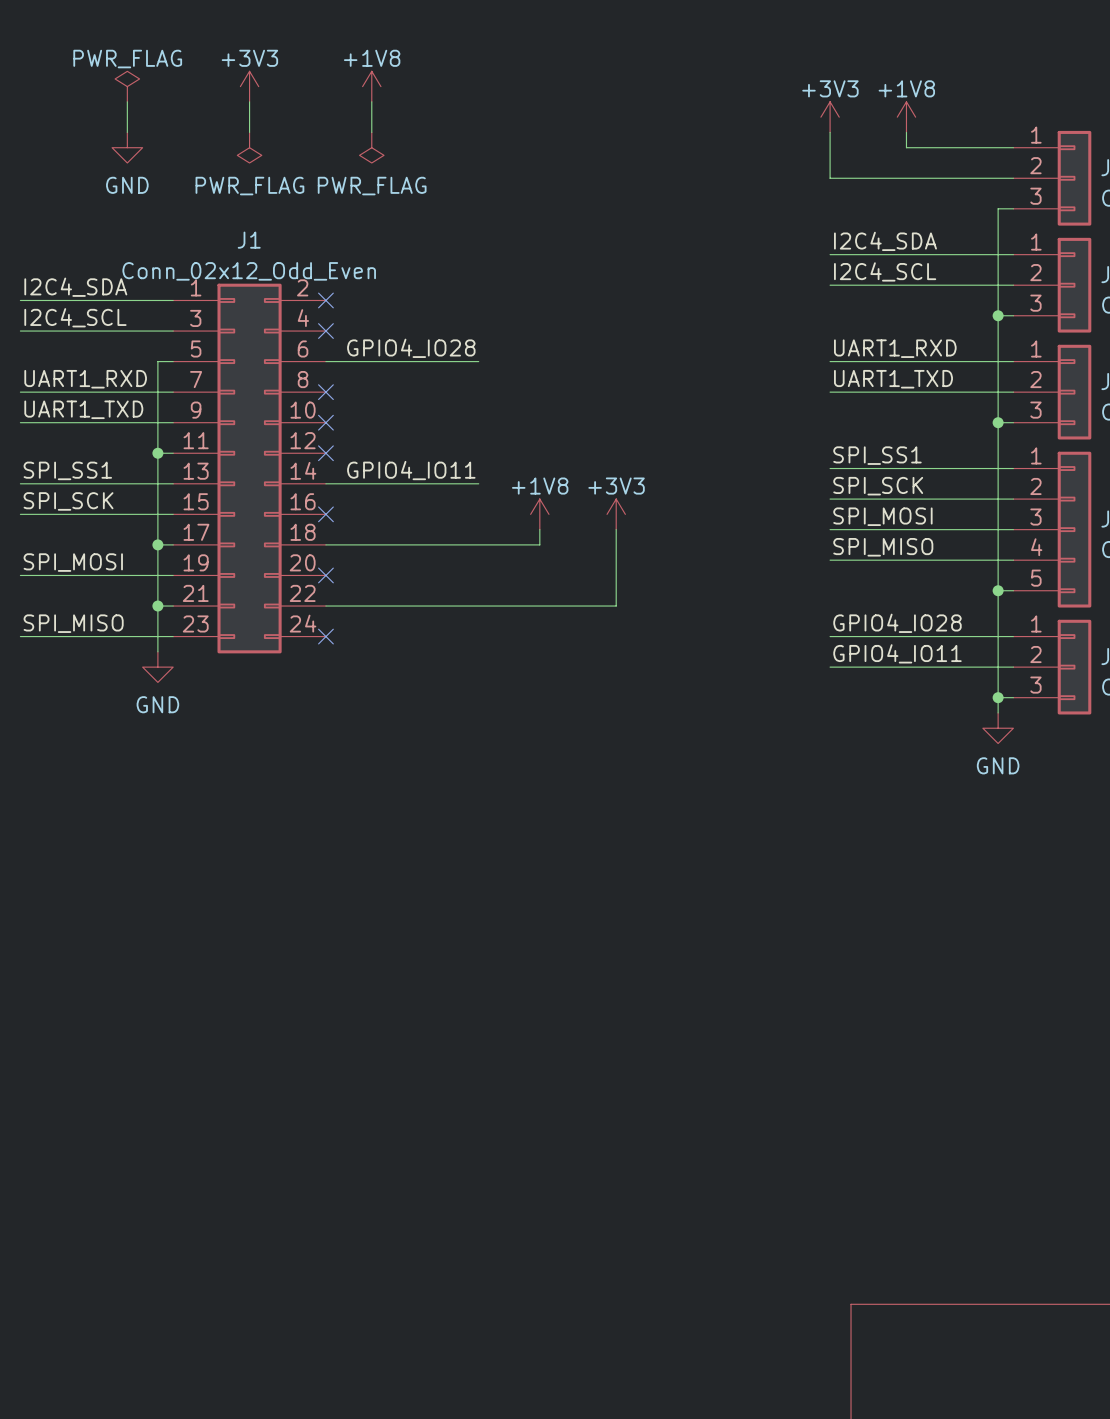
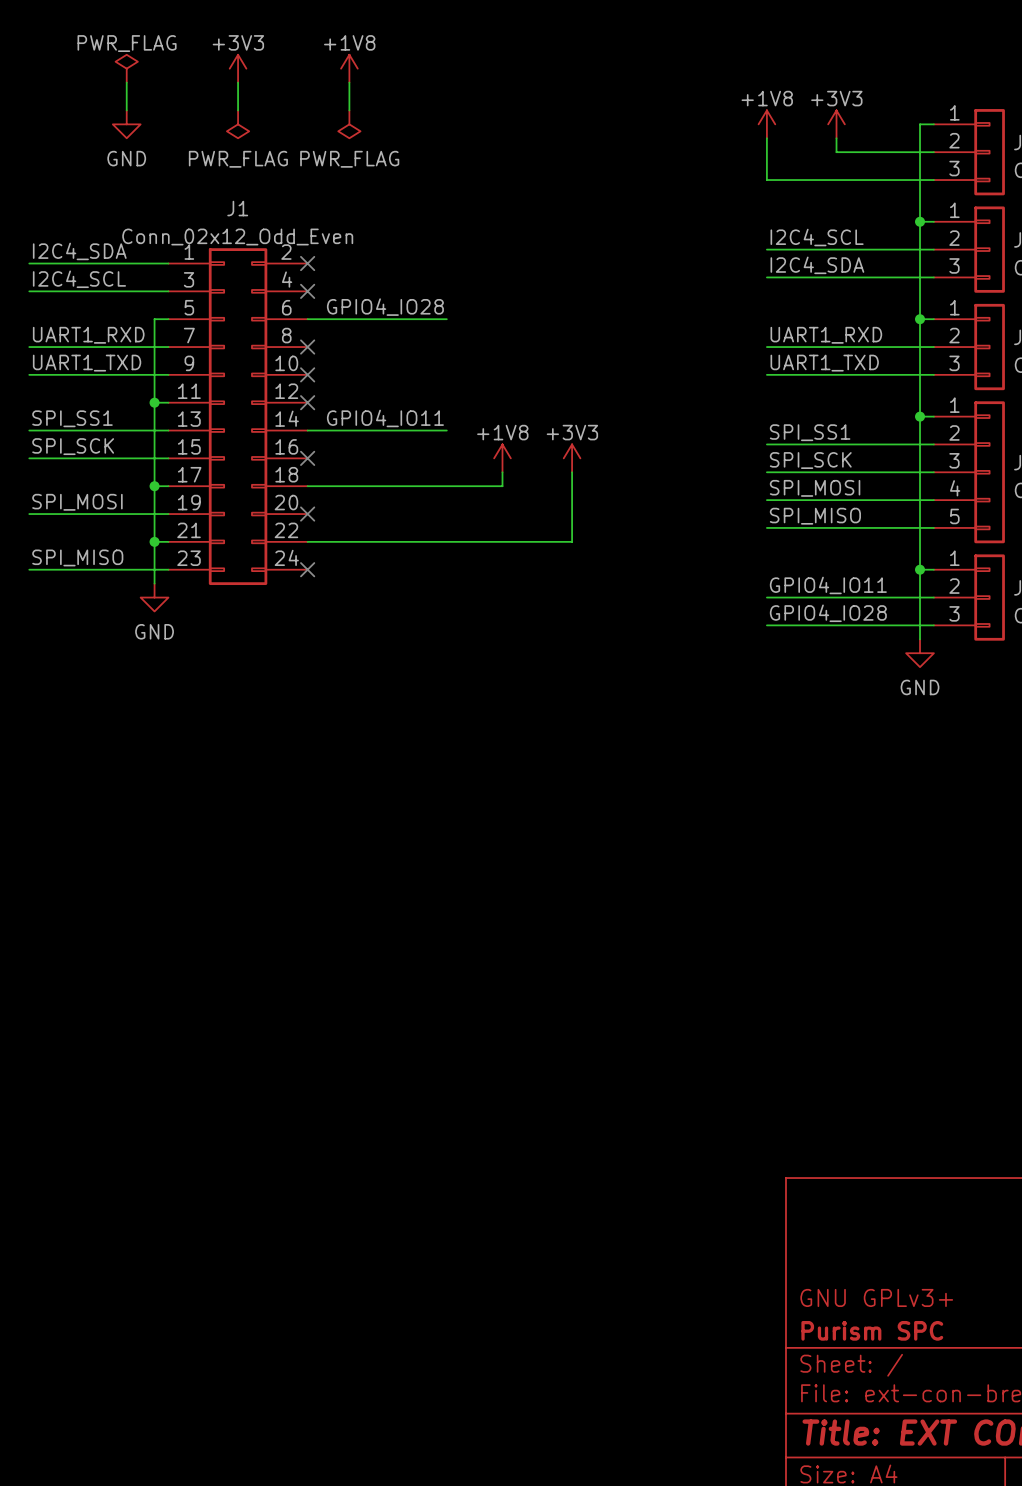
power symbol position: +3V3 (830, 117) -> +3V3 (836, 124)
power symbol position: +1V8 (906, 117) -> +1V8 (766, 124)
wire: (906, 132) (906, 147) (998, 147) -> (766, 152) (766, 180) (920, 180) (920, 124)
wire: (830, 178) (906, 178) -> (836, 138) (836, 152)
label position: I2C4_SDA (885, 241) -> I2C4_SDA (817, 265)
wire: (830, 254) (998, 254) -> none
junction: none -> (920, 221)
junction: (998, 315) -> none
label: UART1_RXD (895, 348) -> none
wire: (830, 361) (998, 361) -> (766, 277) (920, 277)
junction: none -> (920, 319)
label: UART1_TXD (893, 379) -> UART1_RXD (826, 335)
label: none -> UART1_TXD (824, 363)
junction: (998, 422) -> none
label: SPI_SS1 (877, 455) -> none
wire: (830, 468) (998, 468) -> (766, 374) (920, 374)
junction: none -> (920, 416)
label: SPI_SCK (878, 486) -> SPI_SS1 (810, 432)
label: SPI_MOSI (882, 516) -> SPI_SCK (810, 460)
label: SPI_MISO (883, 547) -> SPI_MOSI (815, 488)
label: none -> SPI_MISO (815, 516)
junction: (998, 590) -> none
label position: GPIO4_IO28 (897, 623) -> GPIO4_IO28 (828, 613)
wire: (830, 636) (998, 636) -> (766, 527) (920, 527)
junction: none -> (920, 569)
wire: none -> (766, 625) (920, 625)
junction: (998, 697) -> none

